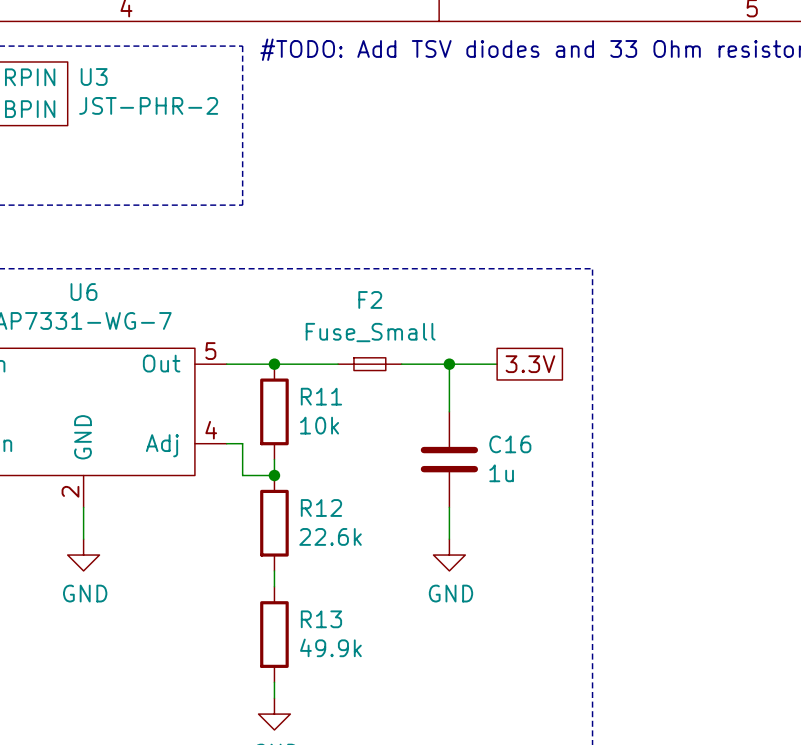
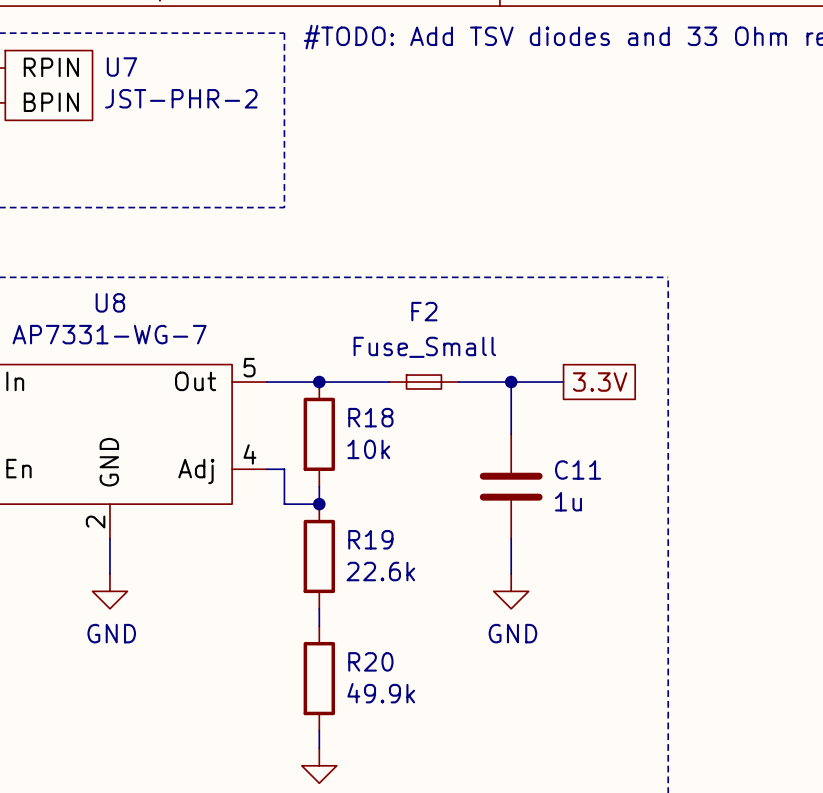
U3 name: U3 (94, 76) -> U7 (121, 67)
U6 name: U6 (83, 292) -> U8 (110, 302)
R11 name: R11 (321, 396) -> R18 (370, 417)
C16 name: C16 (510, 444) -> C11 (578, 469)
R12 name: R12 (321, 507) -> R19 (370, 539)
R13 name: R13 (321, 619) -> R20 (370, 661)

